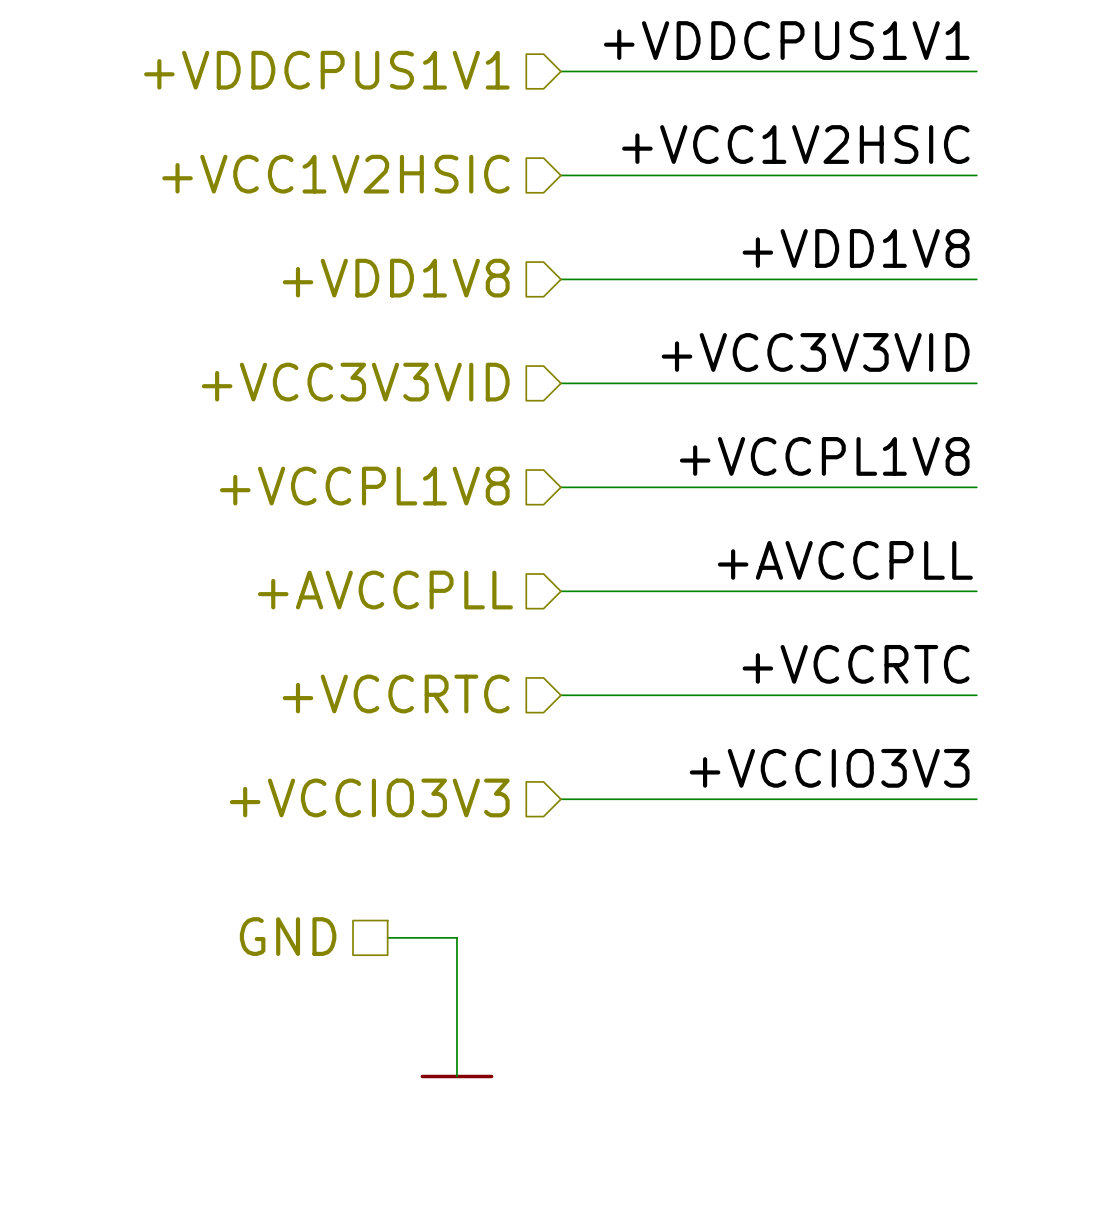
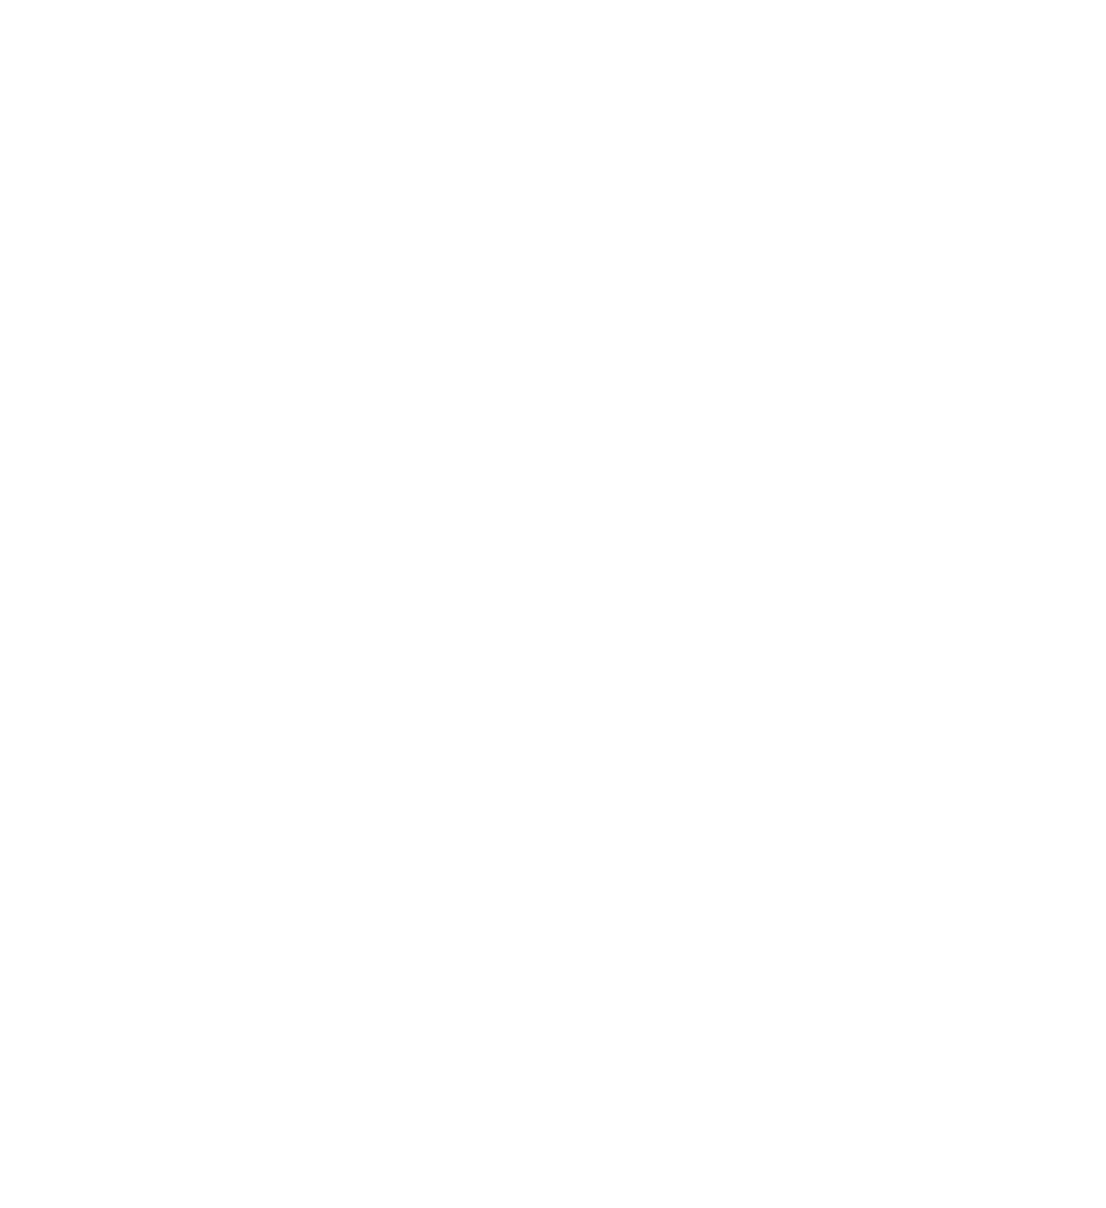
label: +VDDCPUS1V1 (786, 40) -> none
hierarchical label: +VDDCPUS1V1 (326, 70) -> none
wire: (560, 71) (976, 71) -> none
label: +VCC1V2HSIC (795, 144) -> none
hierarchical label: +VCC1V2HSIC (335, 174) -> none
wire: (560, 175) (976, 175) -> none
label: +VDD1V8 (856, 248) -> none
hierarchical label: +VDD1V8 (396, 278) -> none
wire: (560, 279) (976, 279) -> none
label: +VCC3V3VID (815, 352) -> none
hierarchical label: +VCC3V3VID (355, 382) -> none
wire: (560, 383) (976, 383) -> none
label: +VCCPL1V8 (824, 456) -> none
hierarchical label: +VCCPL1V8 (364, 486) -> none
wire: (560, 487) (976, 487) -> none
label: +AVCCPLL (845, 560) -> none
hierarchical label: +AVCCPLL (385, 590) -> none
wire: (560, 591) (976, 591) -> none
label: +VCCRTC (856, 664) -> none
hierarchical label: +VCCRTC (396, 693) -> none
wire: (560, 695) (976, 695) -> none
label: +VCCIO3V3 (829, 768) -> none
hierarchical label: +VCCIO3V3 (369, 797) -> none
wire: (560, 799) (976, 799) -> none
hierarchical label: GND (288, 936) -> none
wire: (387, 937) (456, 937) (456, 1076) -> none
power symbol: (456, 1076) -> none

